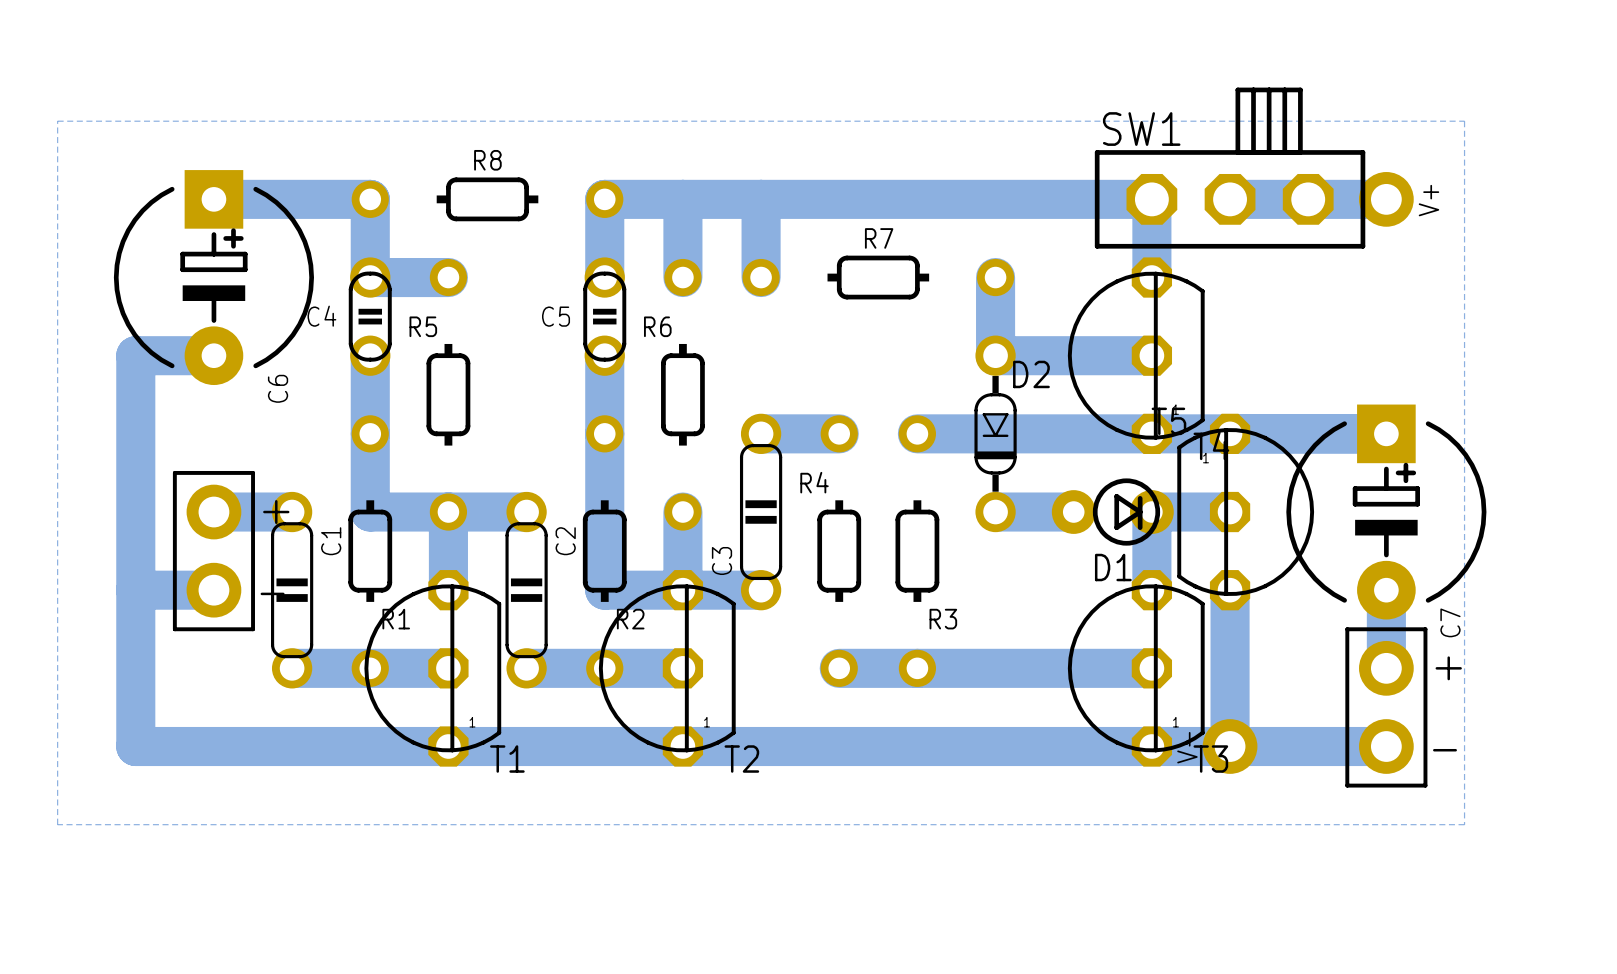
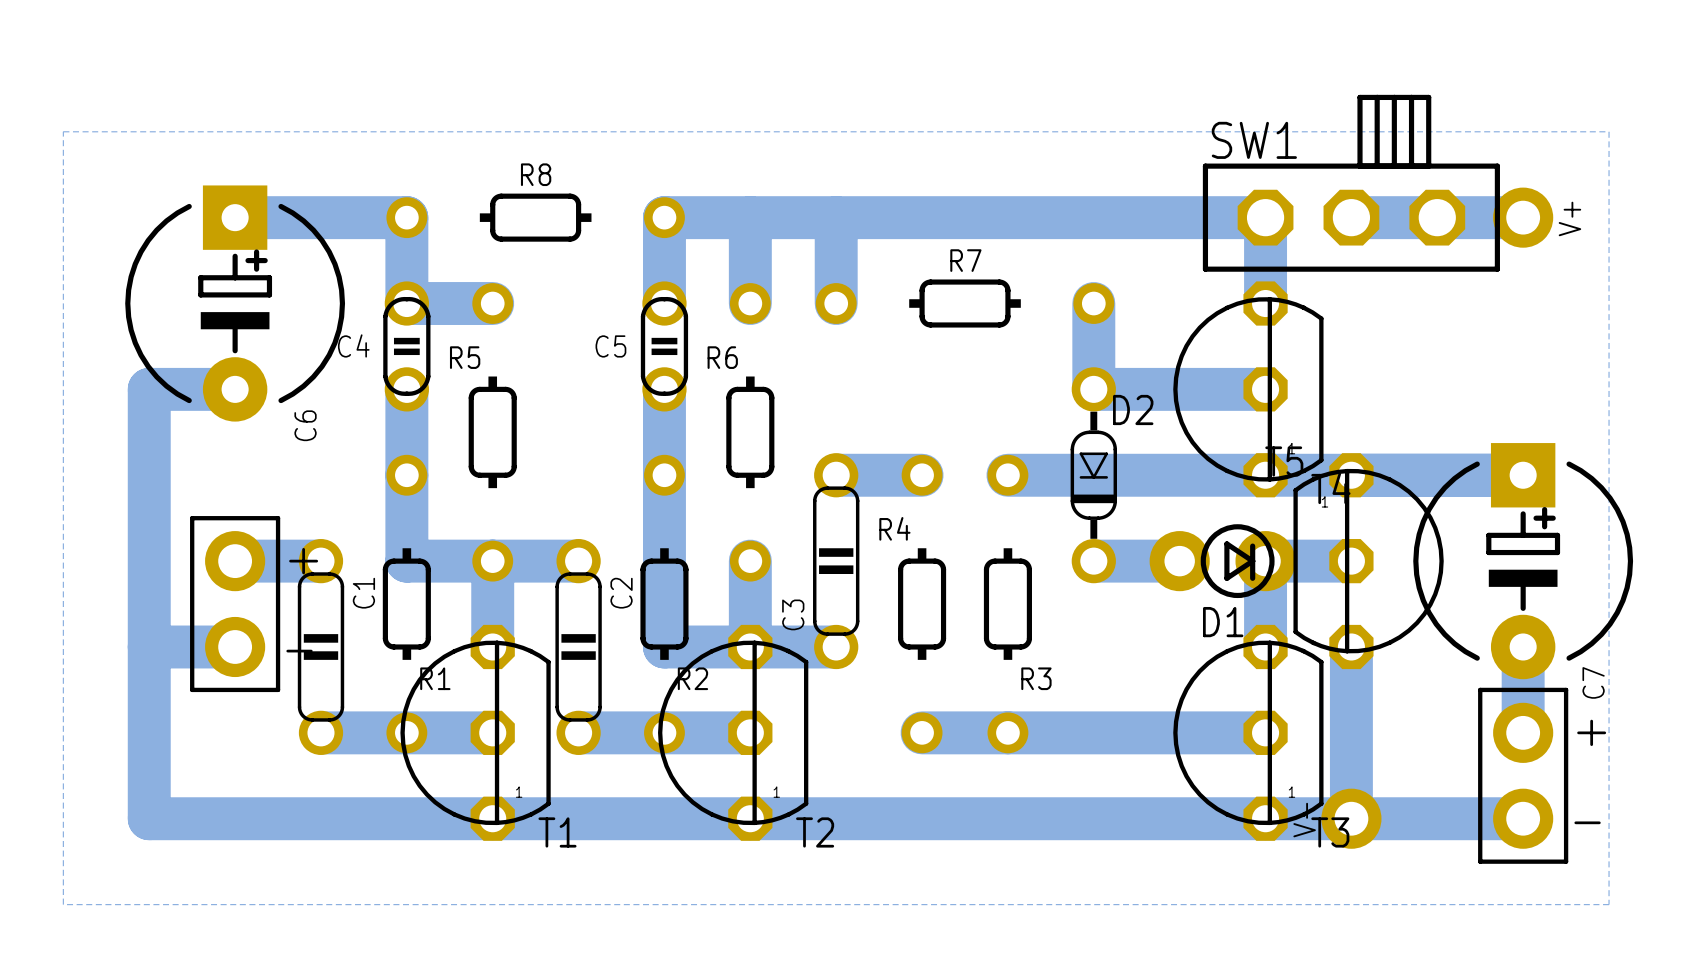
D1 footprint: [1051, 478, 1174, 546] -> [1149, 524, 1296, 599]

